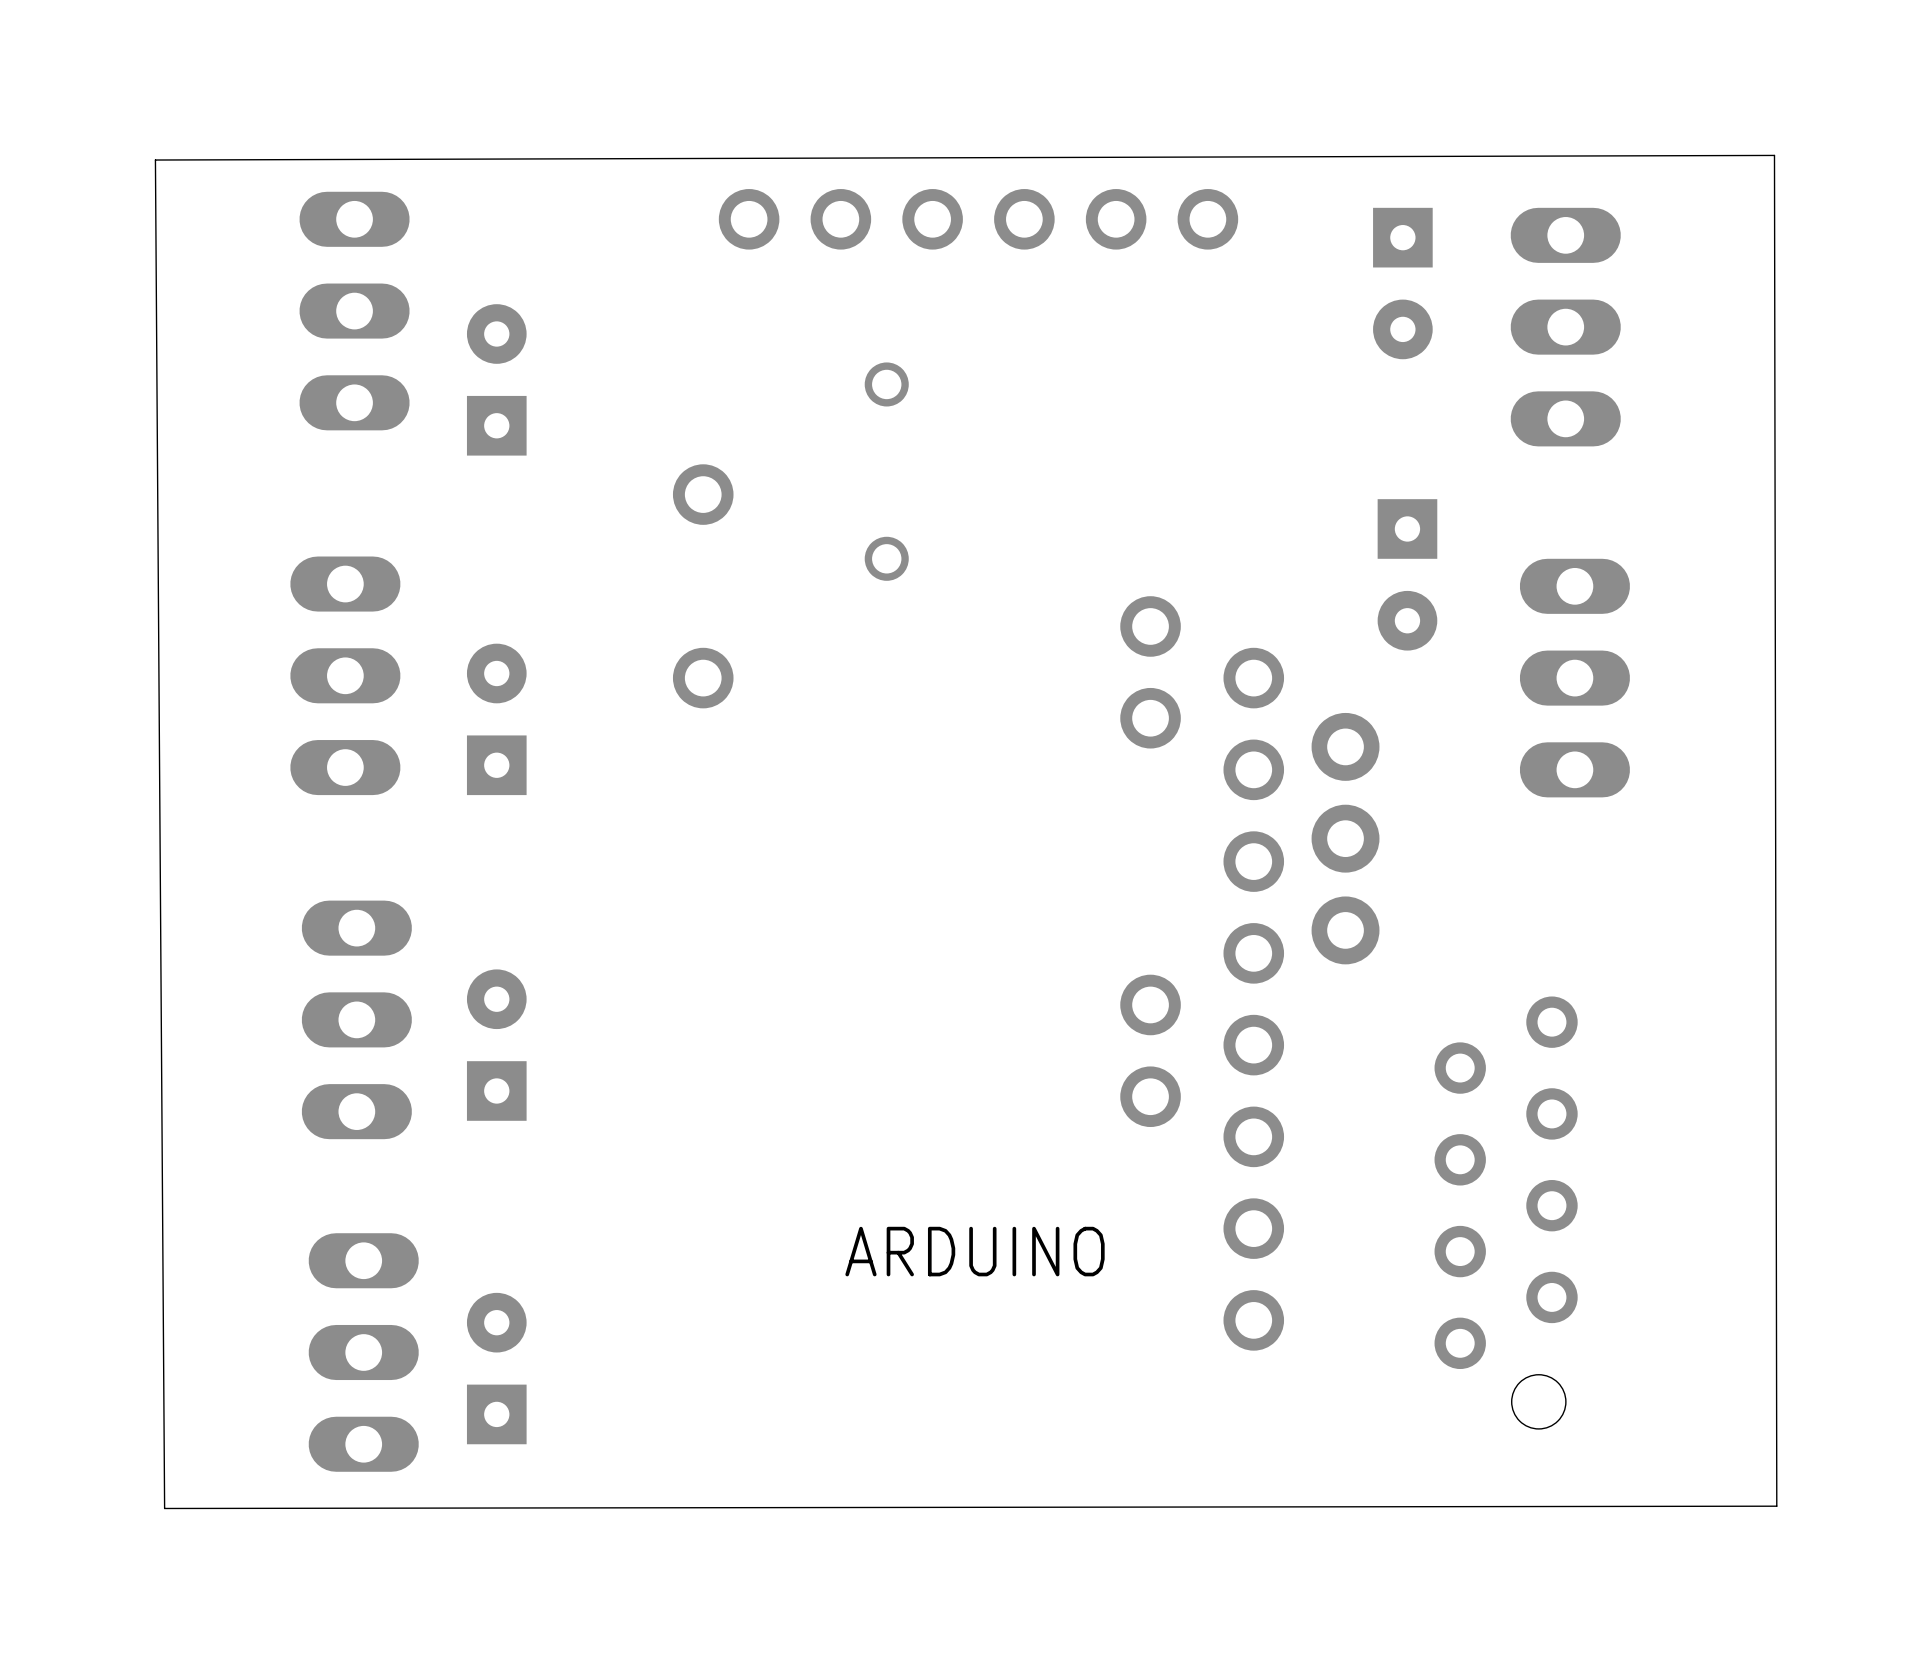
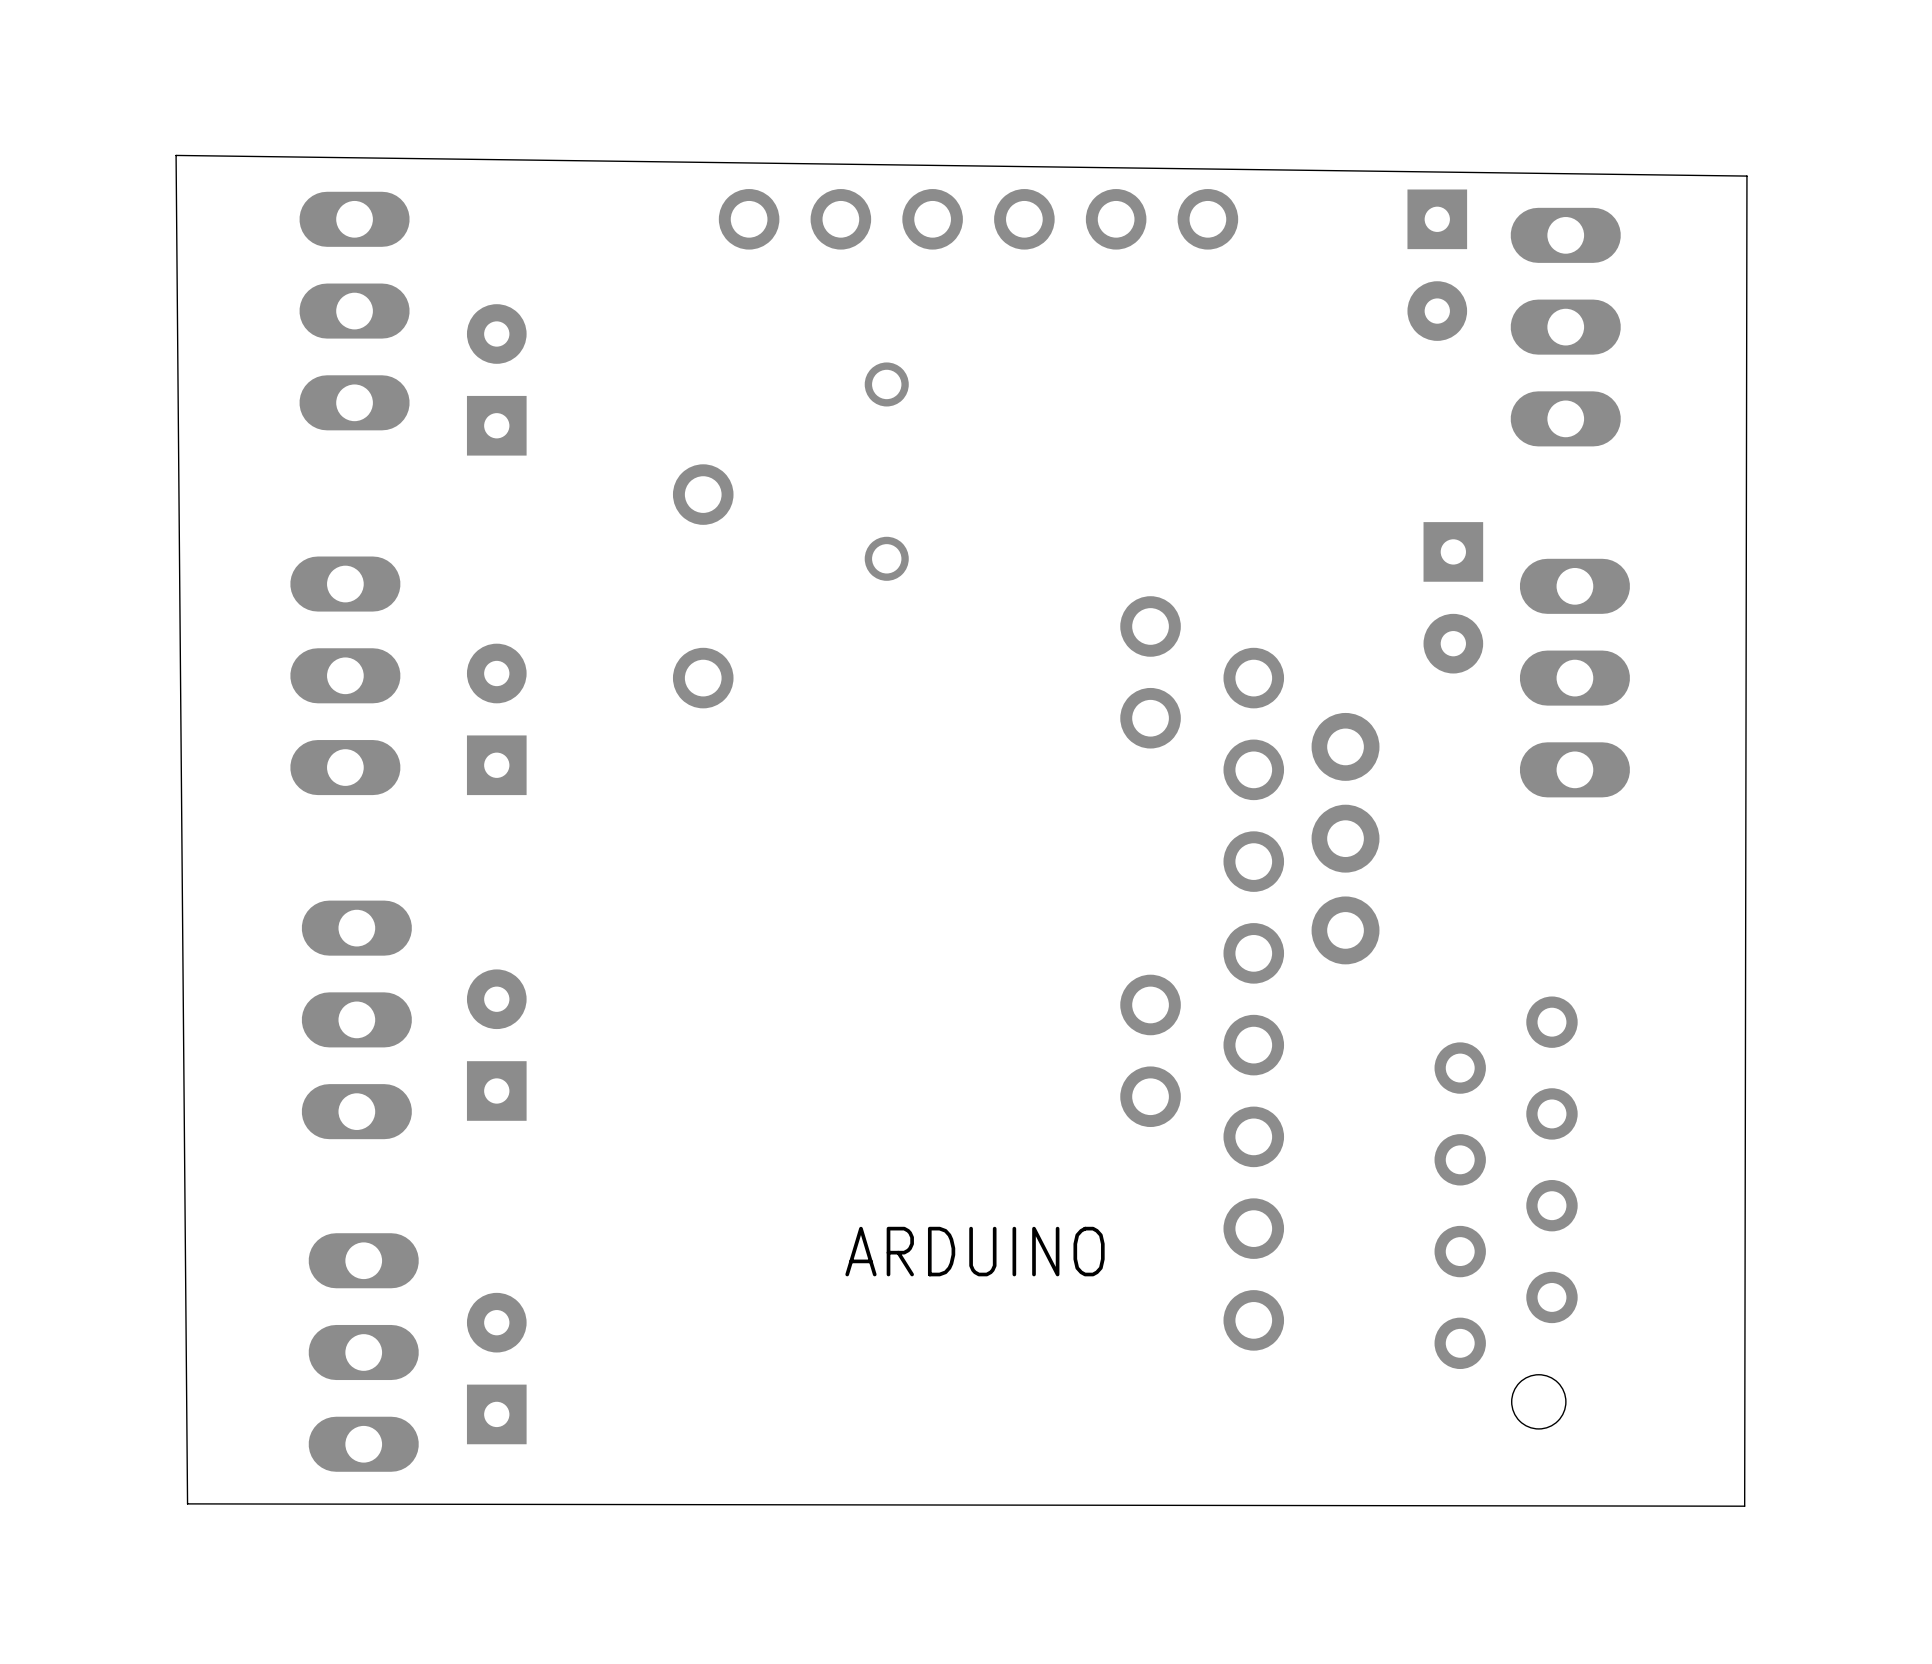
board edge: (1774, 155) (155, 160) (164, 1508) (1776, 1506) (1774, 155) -> (176, 155) (1746, 176) (1744, 1506) (187, 1503) (176, 155)
part position: (1402, 283) -> (1437, 265)
part position: (1407, 574) -> (1453, 597)

